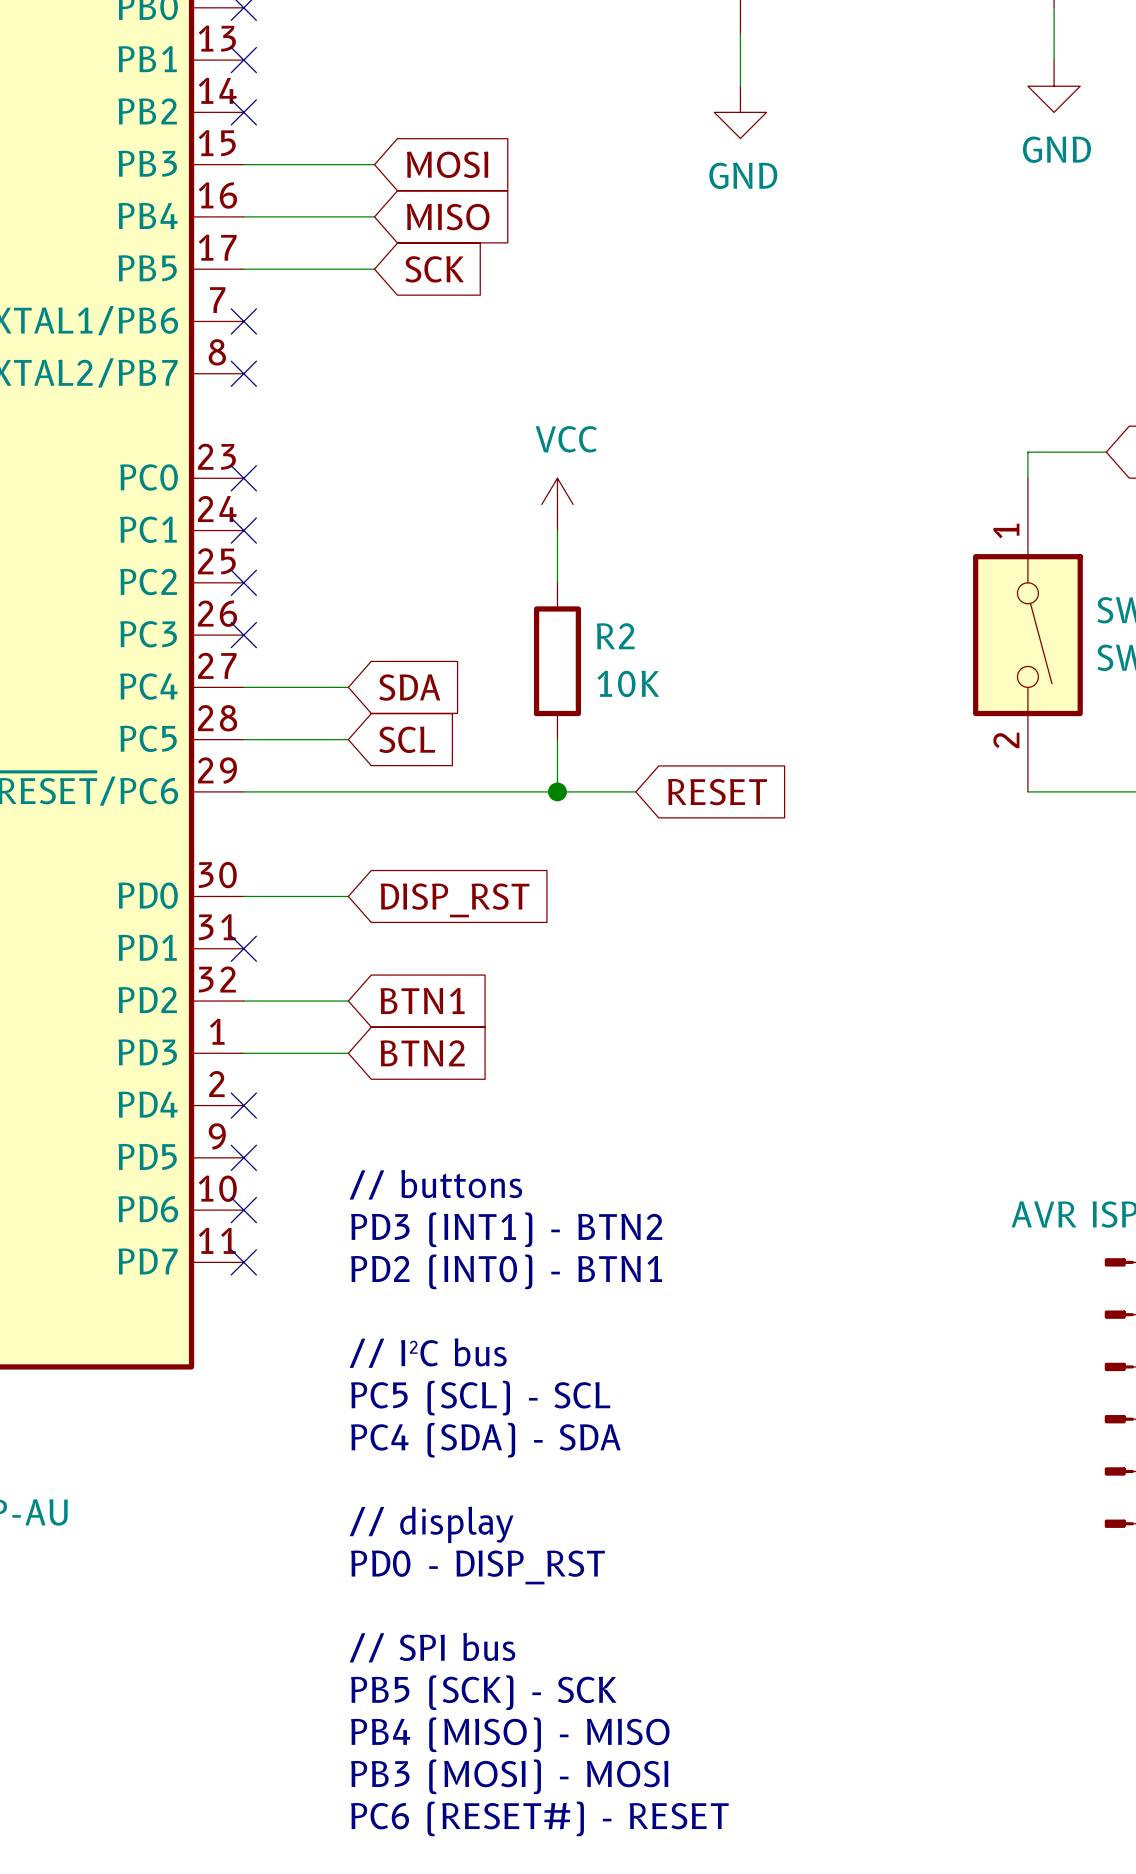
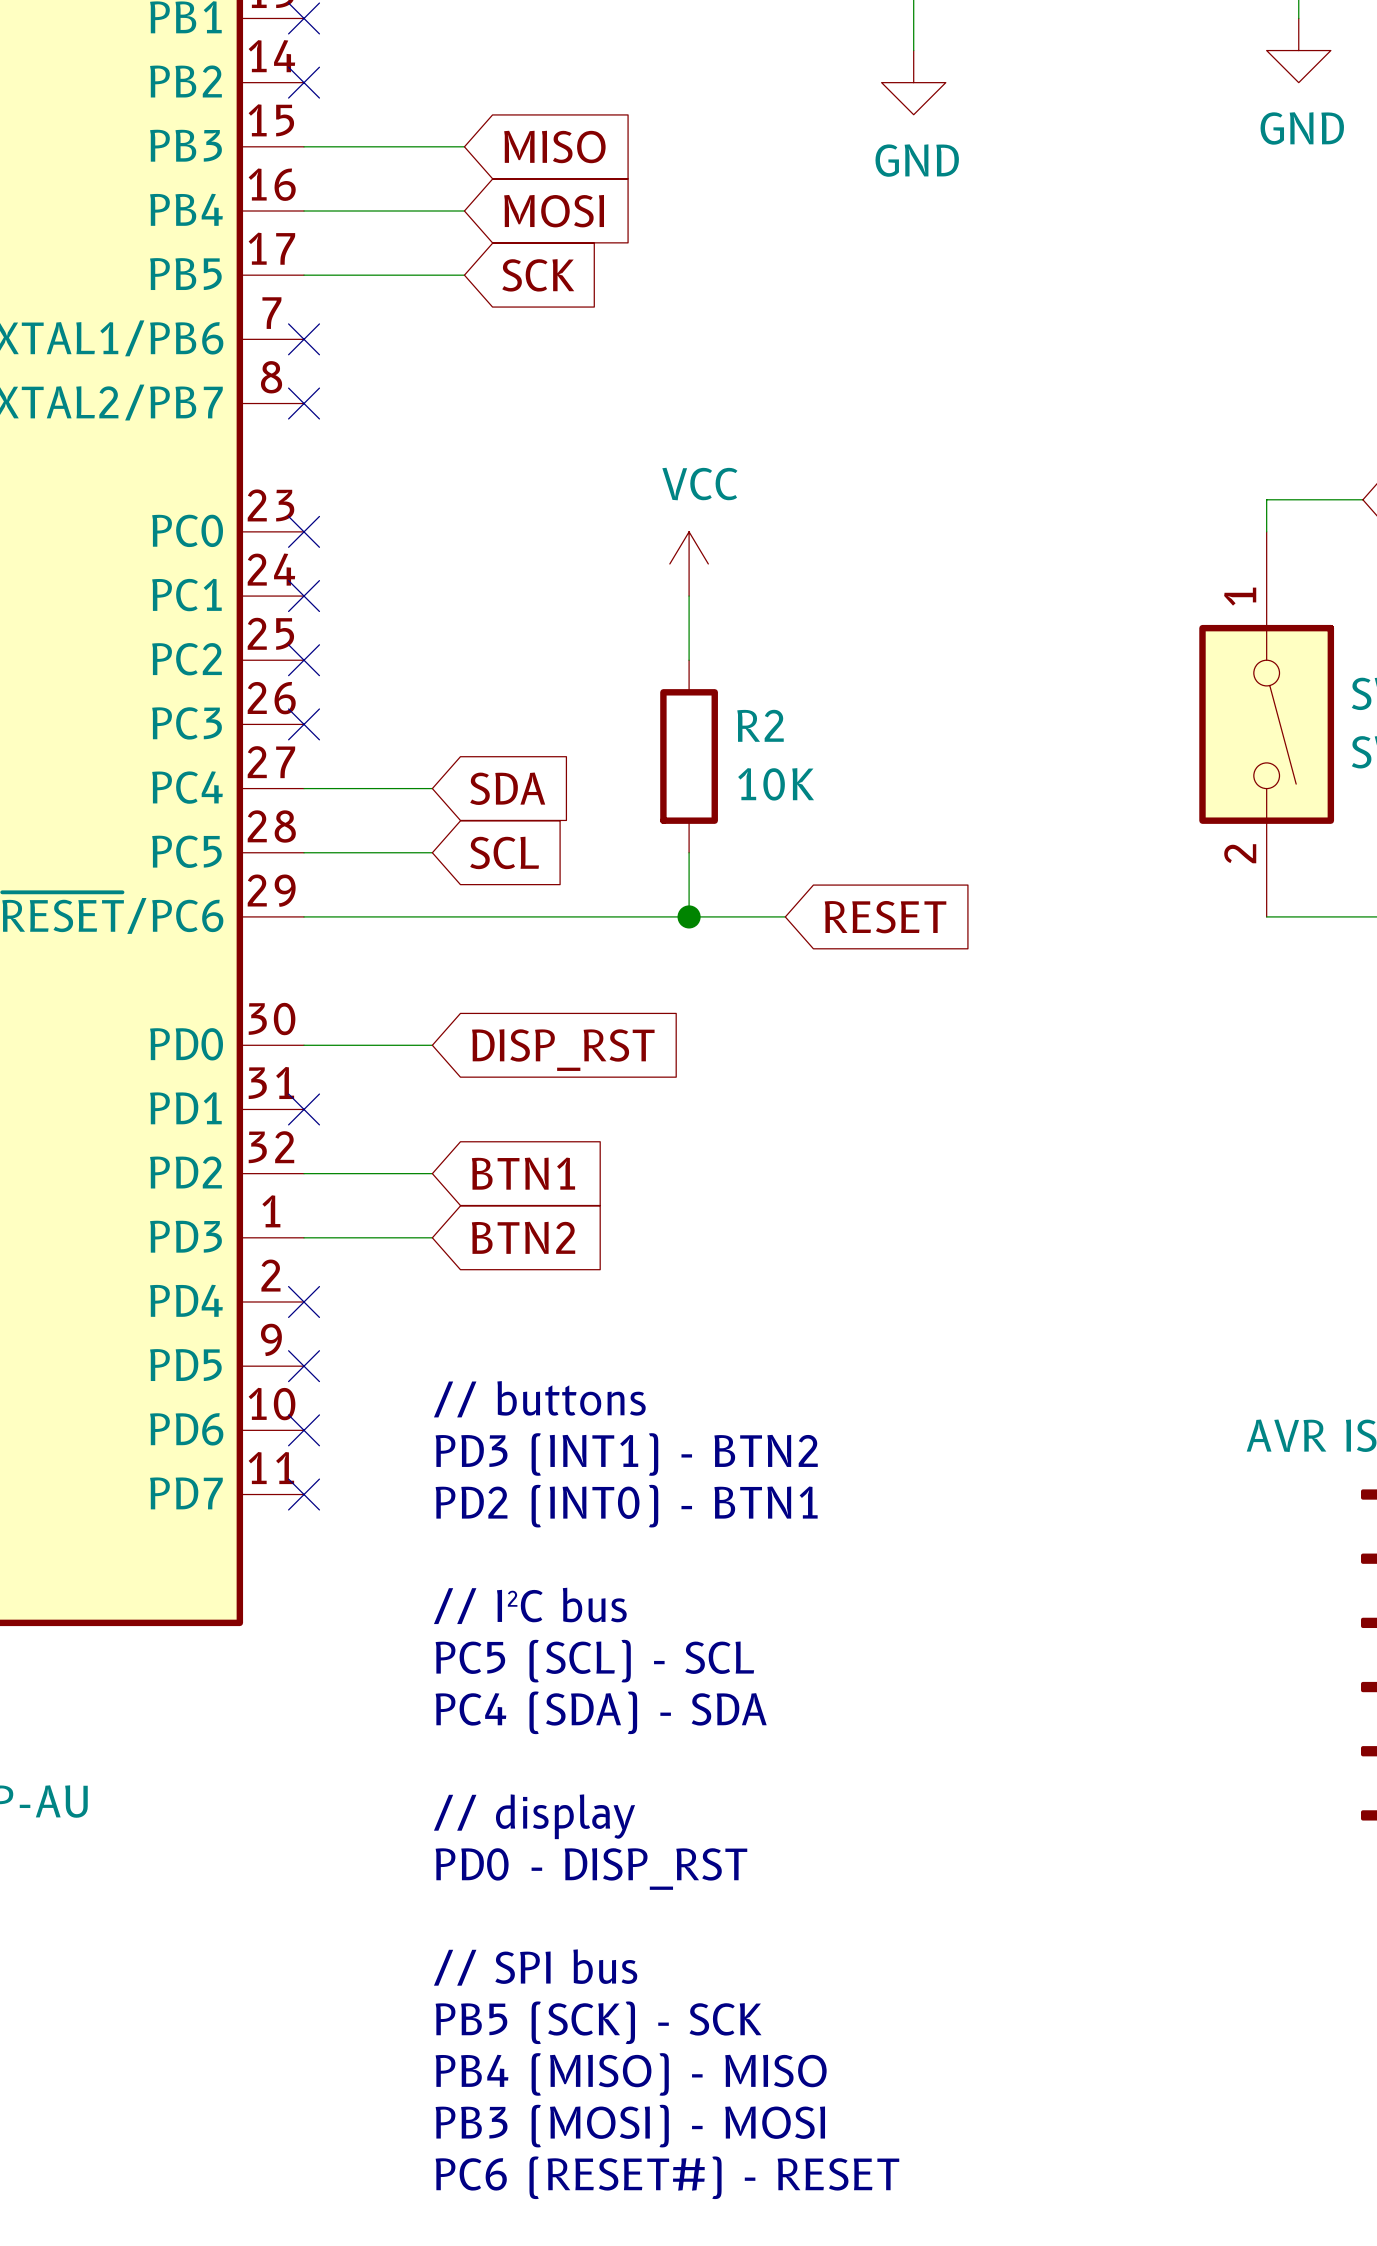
global label: MOSI (447, 164) -> MISO (554, 147)
global label: MISO (448, 217) -> MOSI (554, 211)

